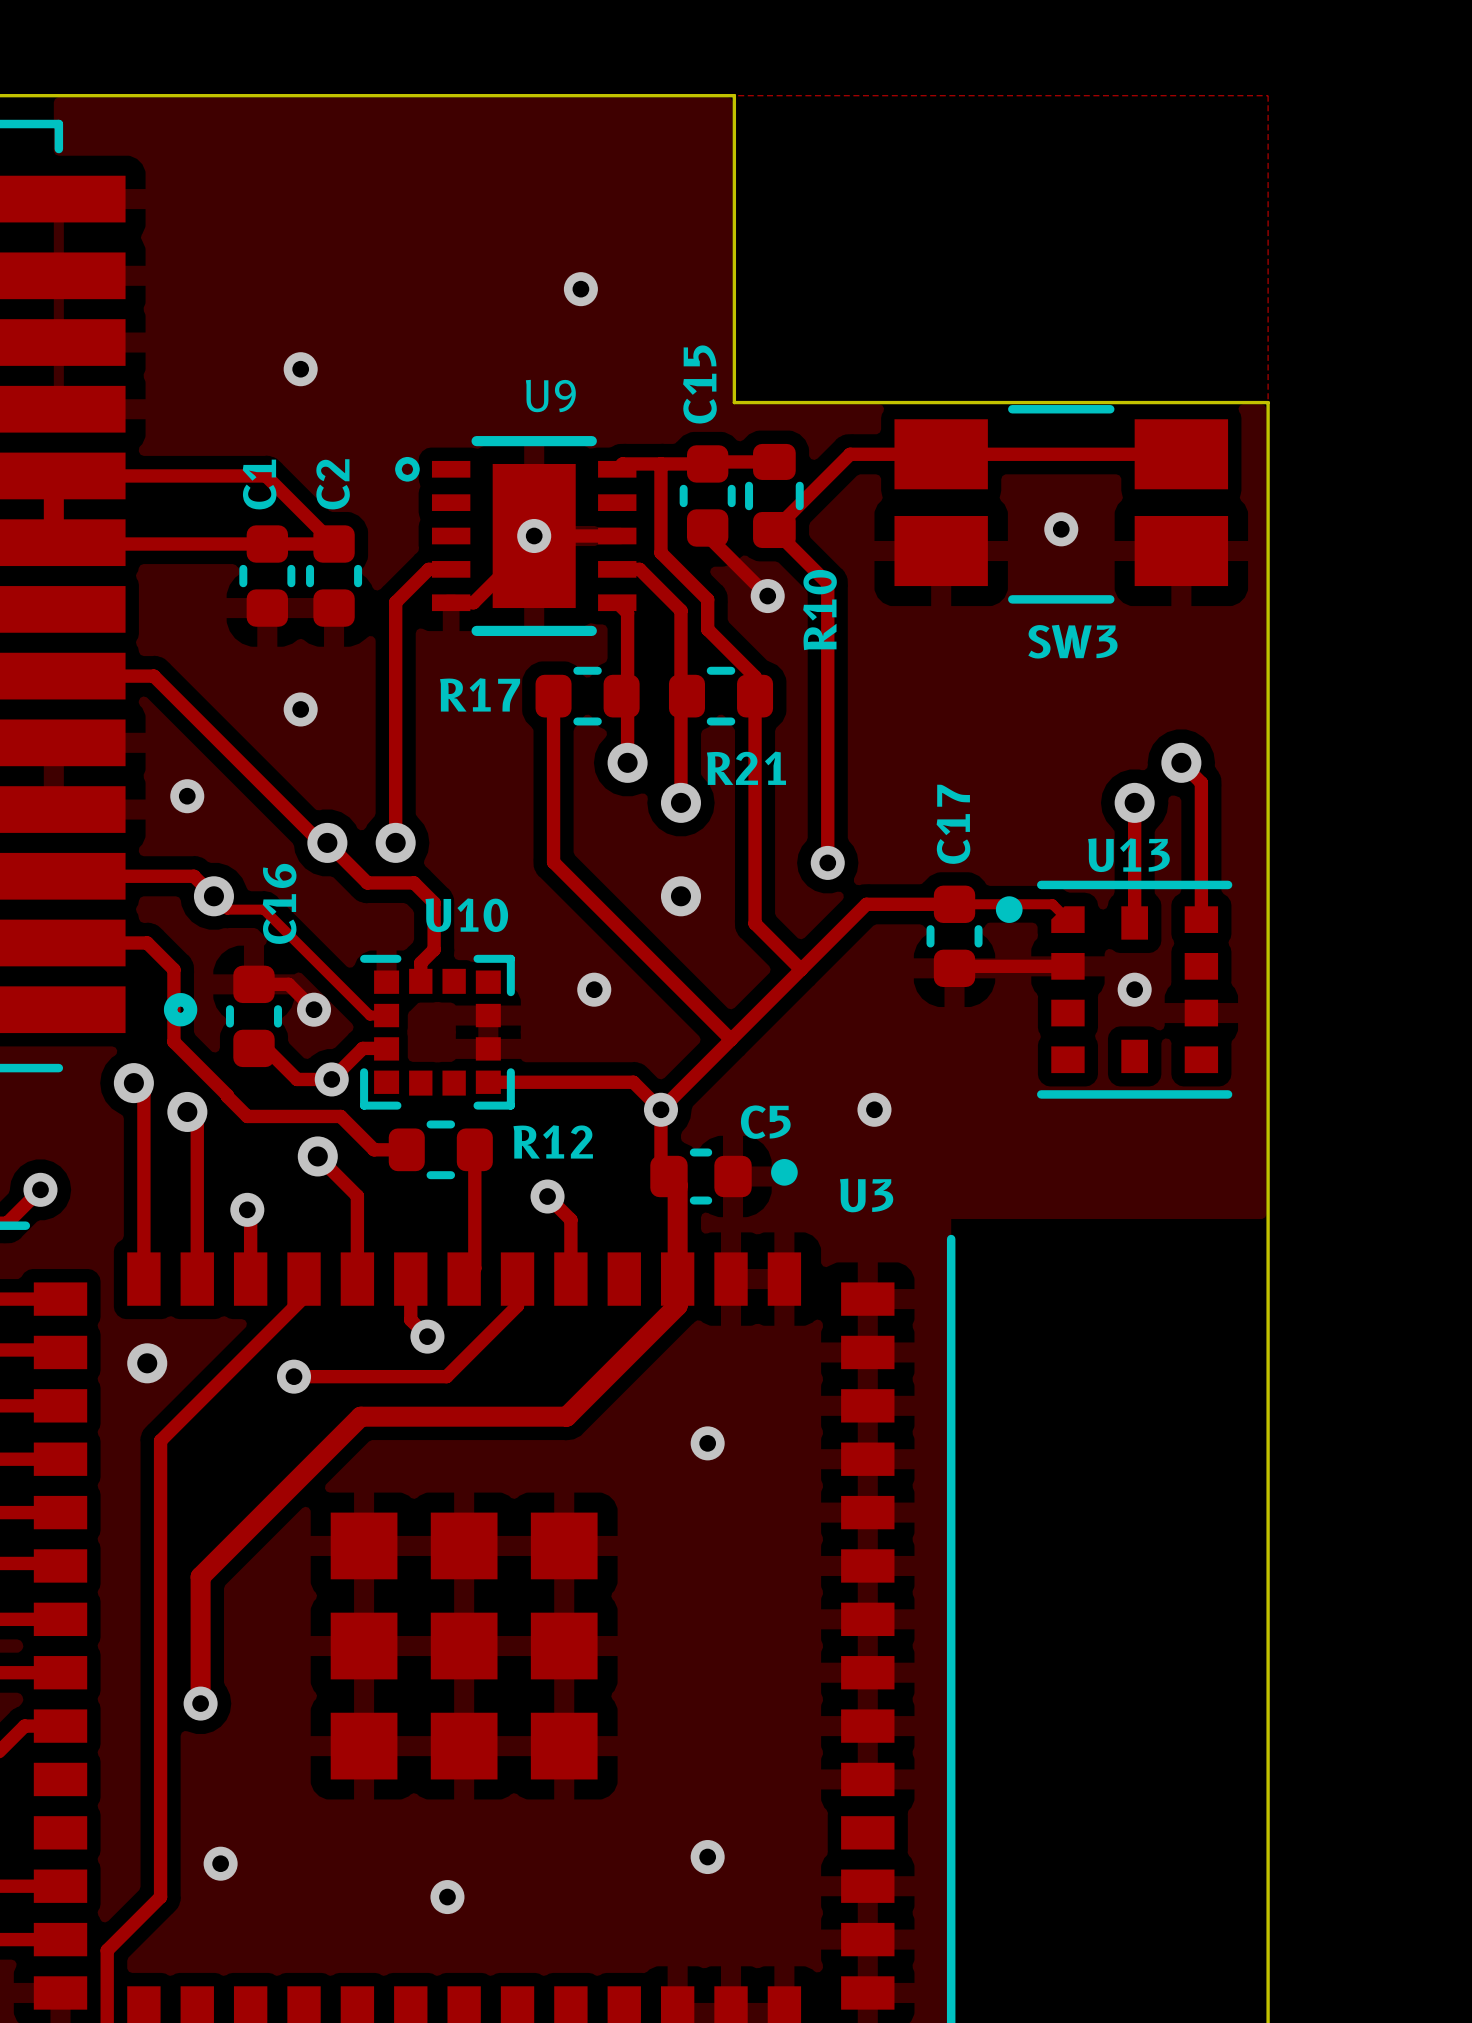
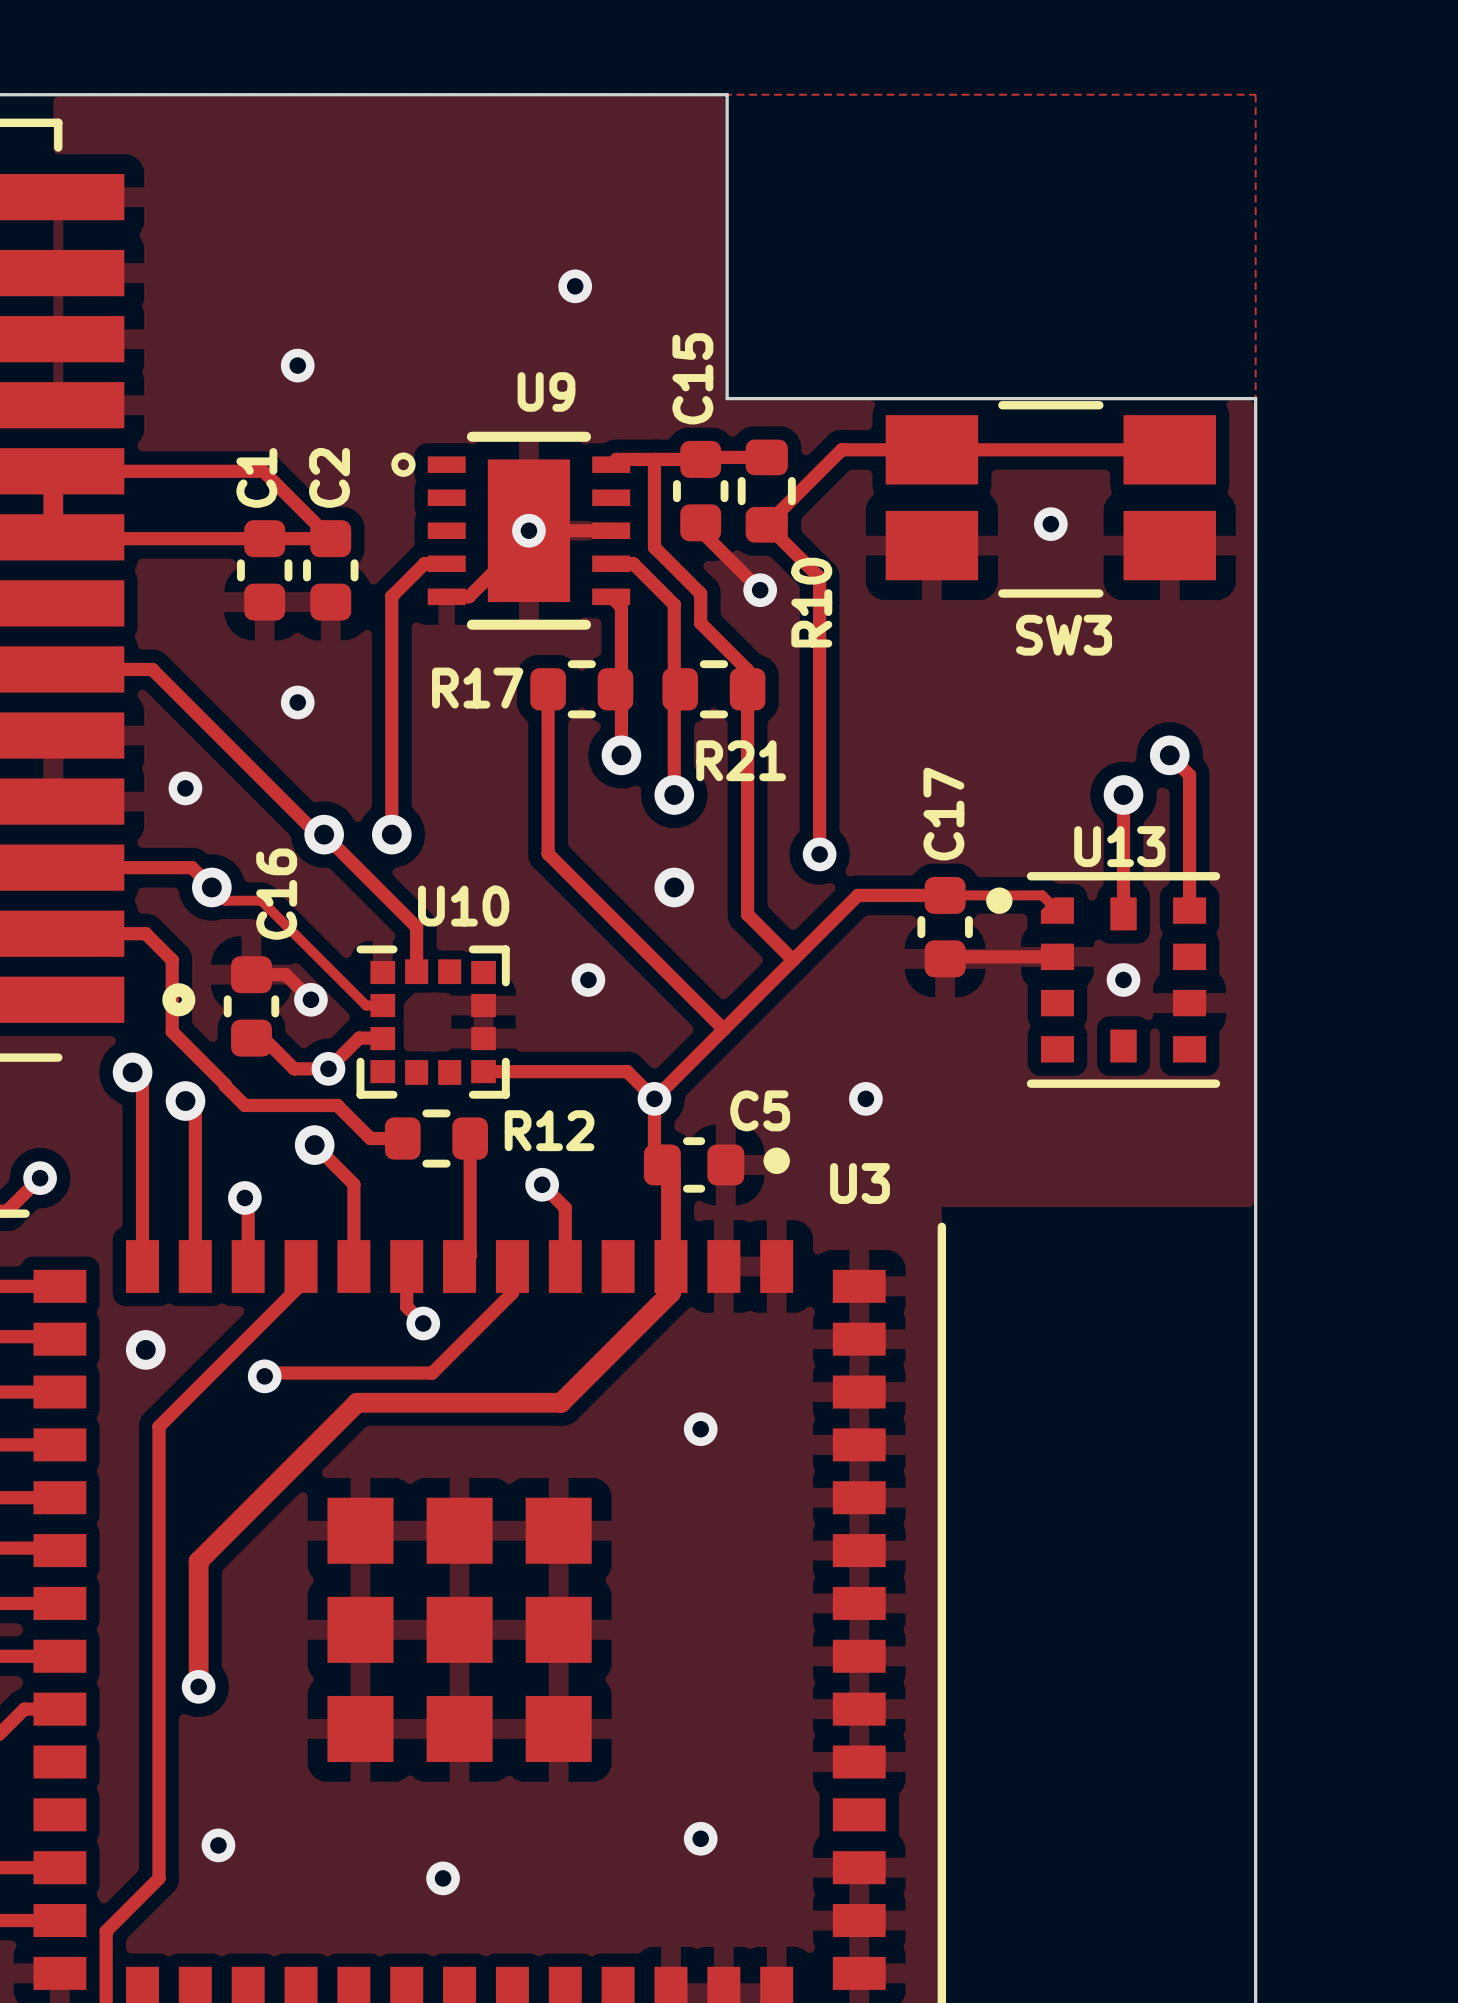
track: (367, 882) (414, 882) (434, 902) (434, 949) (420, 963) -> (363, 874) (416, 927) (416, 953)
track: (294, 1376) (446, 1376) -> (264, 1376) (268, 1373) (432, 1373) (442, 1363)
via position: (294, 1376) -> (264, 1376)

